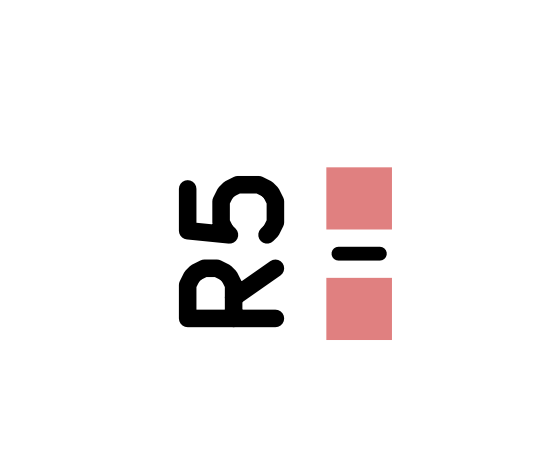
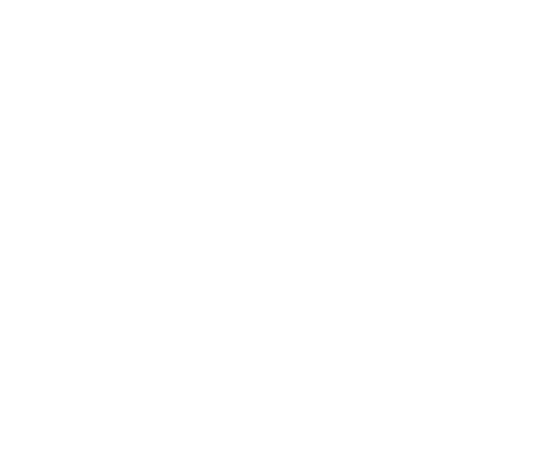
R5: (359, 253) -> none

